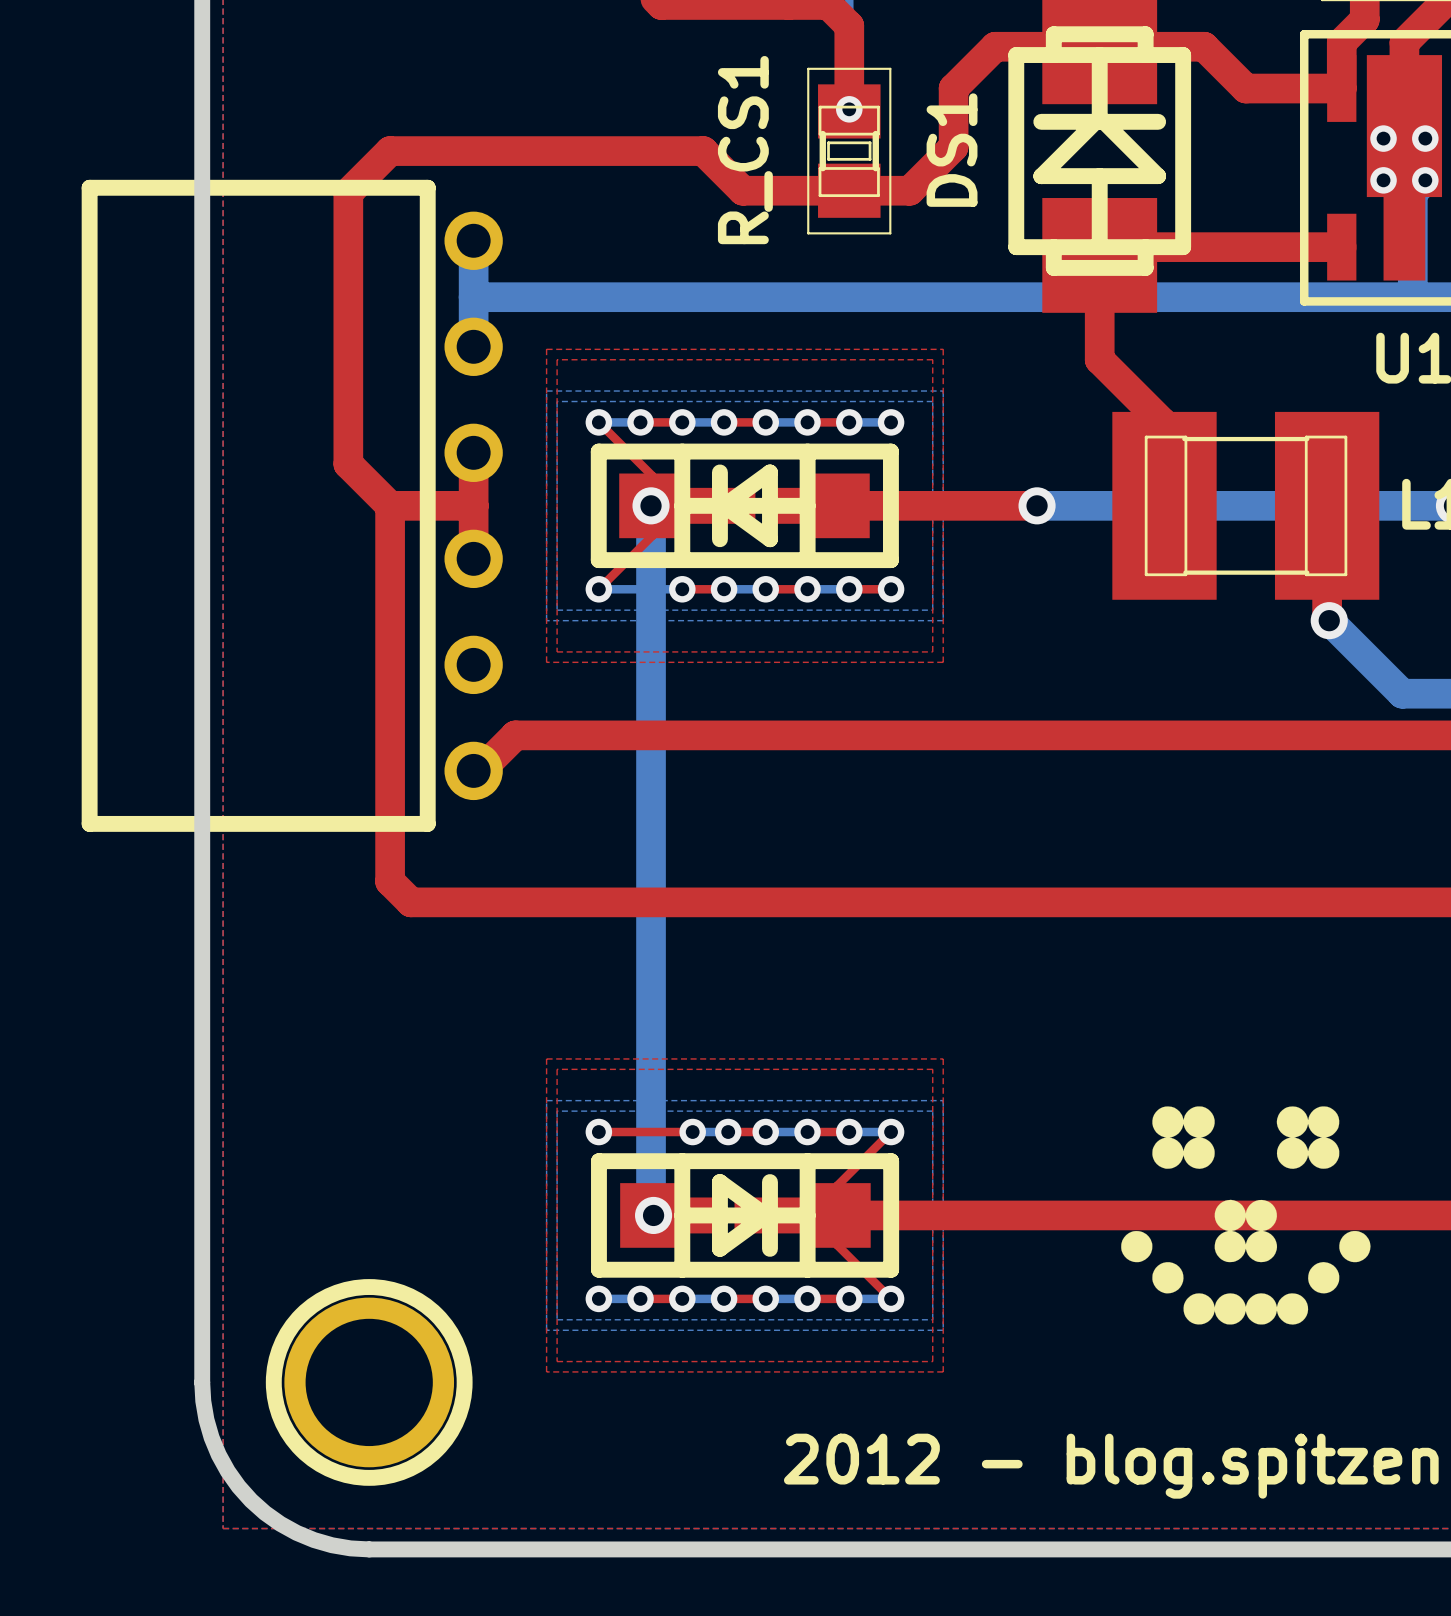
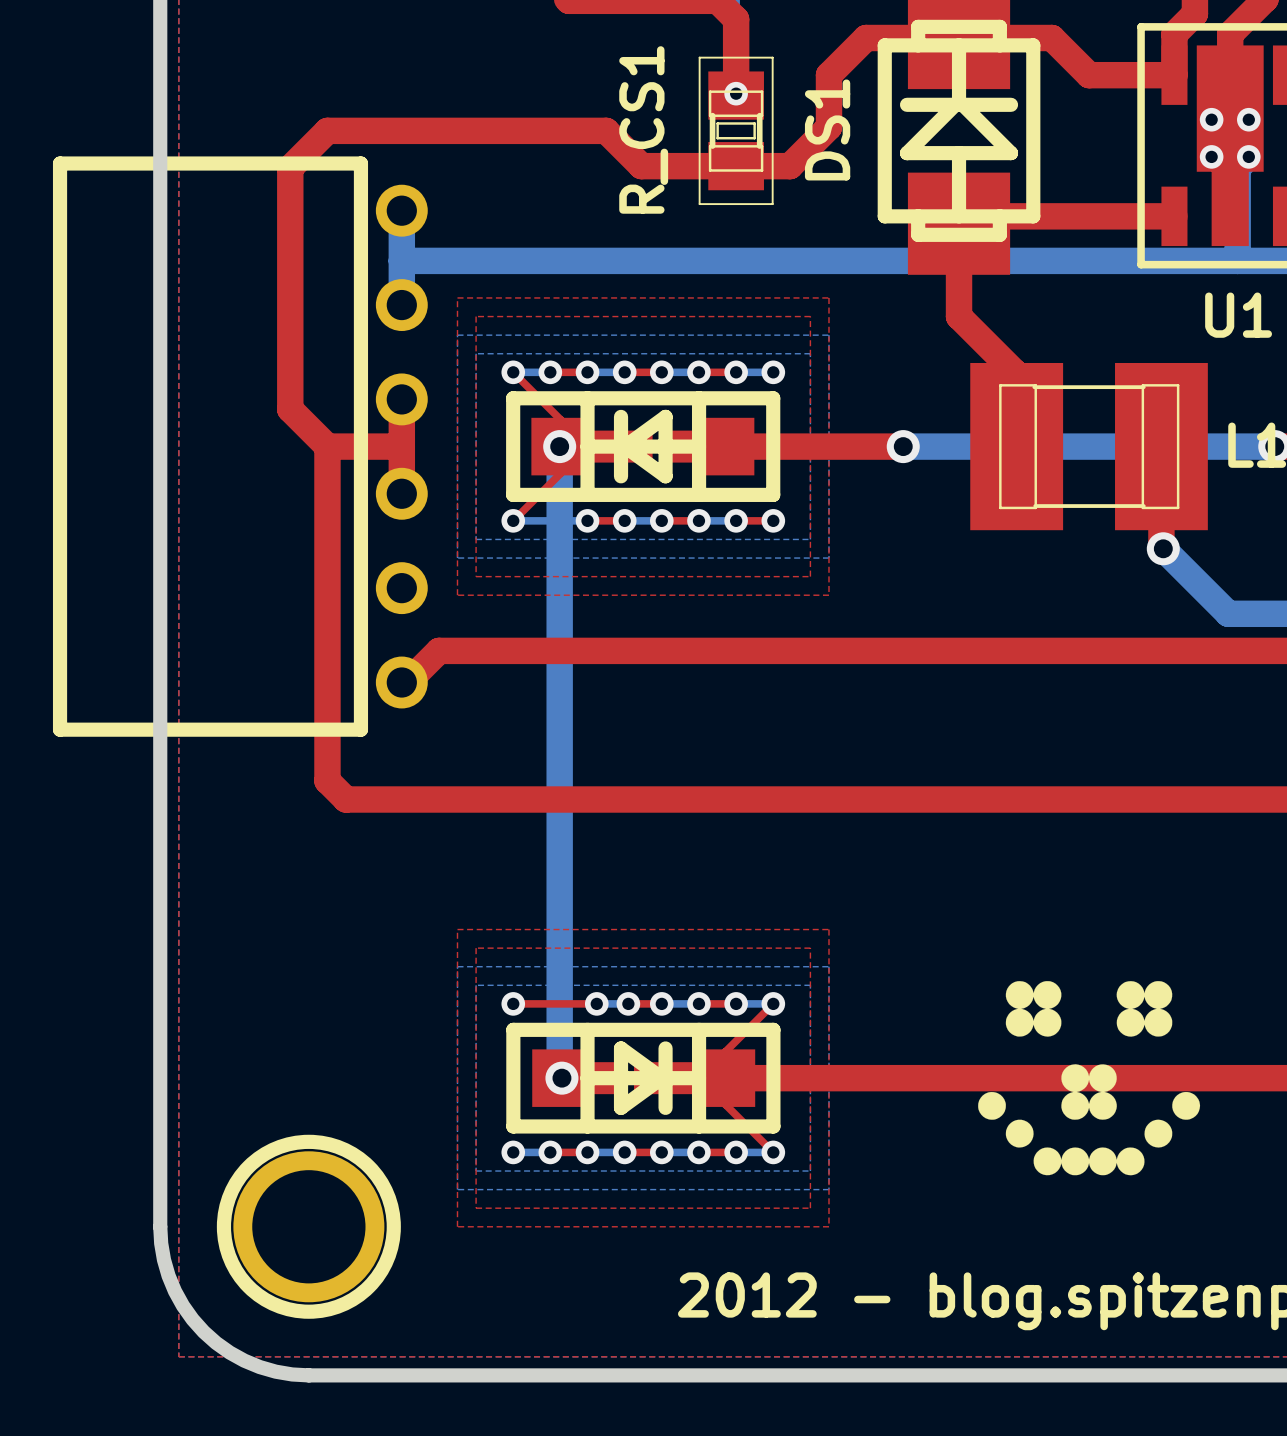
top zone outline: (546, 349) (546, 662) (943, 662) (943, 349) (546, 349) -> (457, 297) (457, 595) (828, 595) (828, 297) (457, 297)
bottom zone outline: (546, 391) (546, 620) (943, 620) (943, 391) (546, 391) -> (457, 335) (457, 558) (828, 558) (828, 335) (457, 335)
top zone outline: (546, 1058) (943, 1058) (943, 1371) (546, 1371) (546, 1058) -> (457, 929) (457, 1226) (828, 1226) (828, 929) (457, 929)
bottom zone outline: (546, 1100) (943, 1100) (943, 1330) (546, 1330) (546, 1100) -> (457, 966) (457, 1189) (828, 1189) (828, 966) (457, 966)

